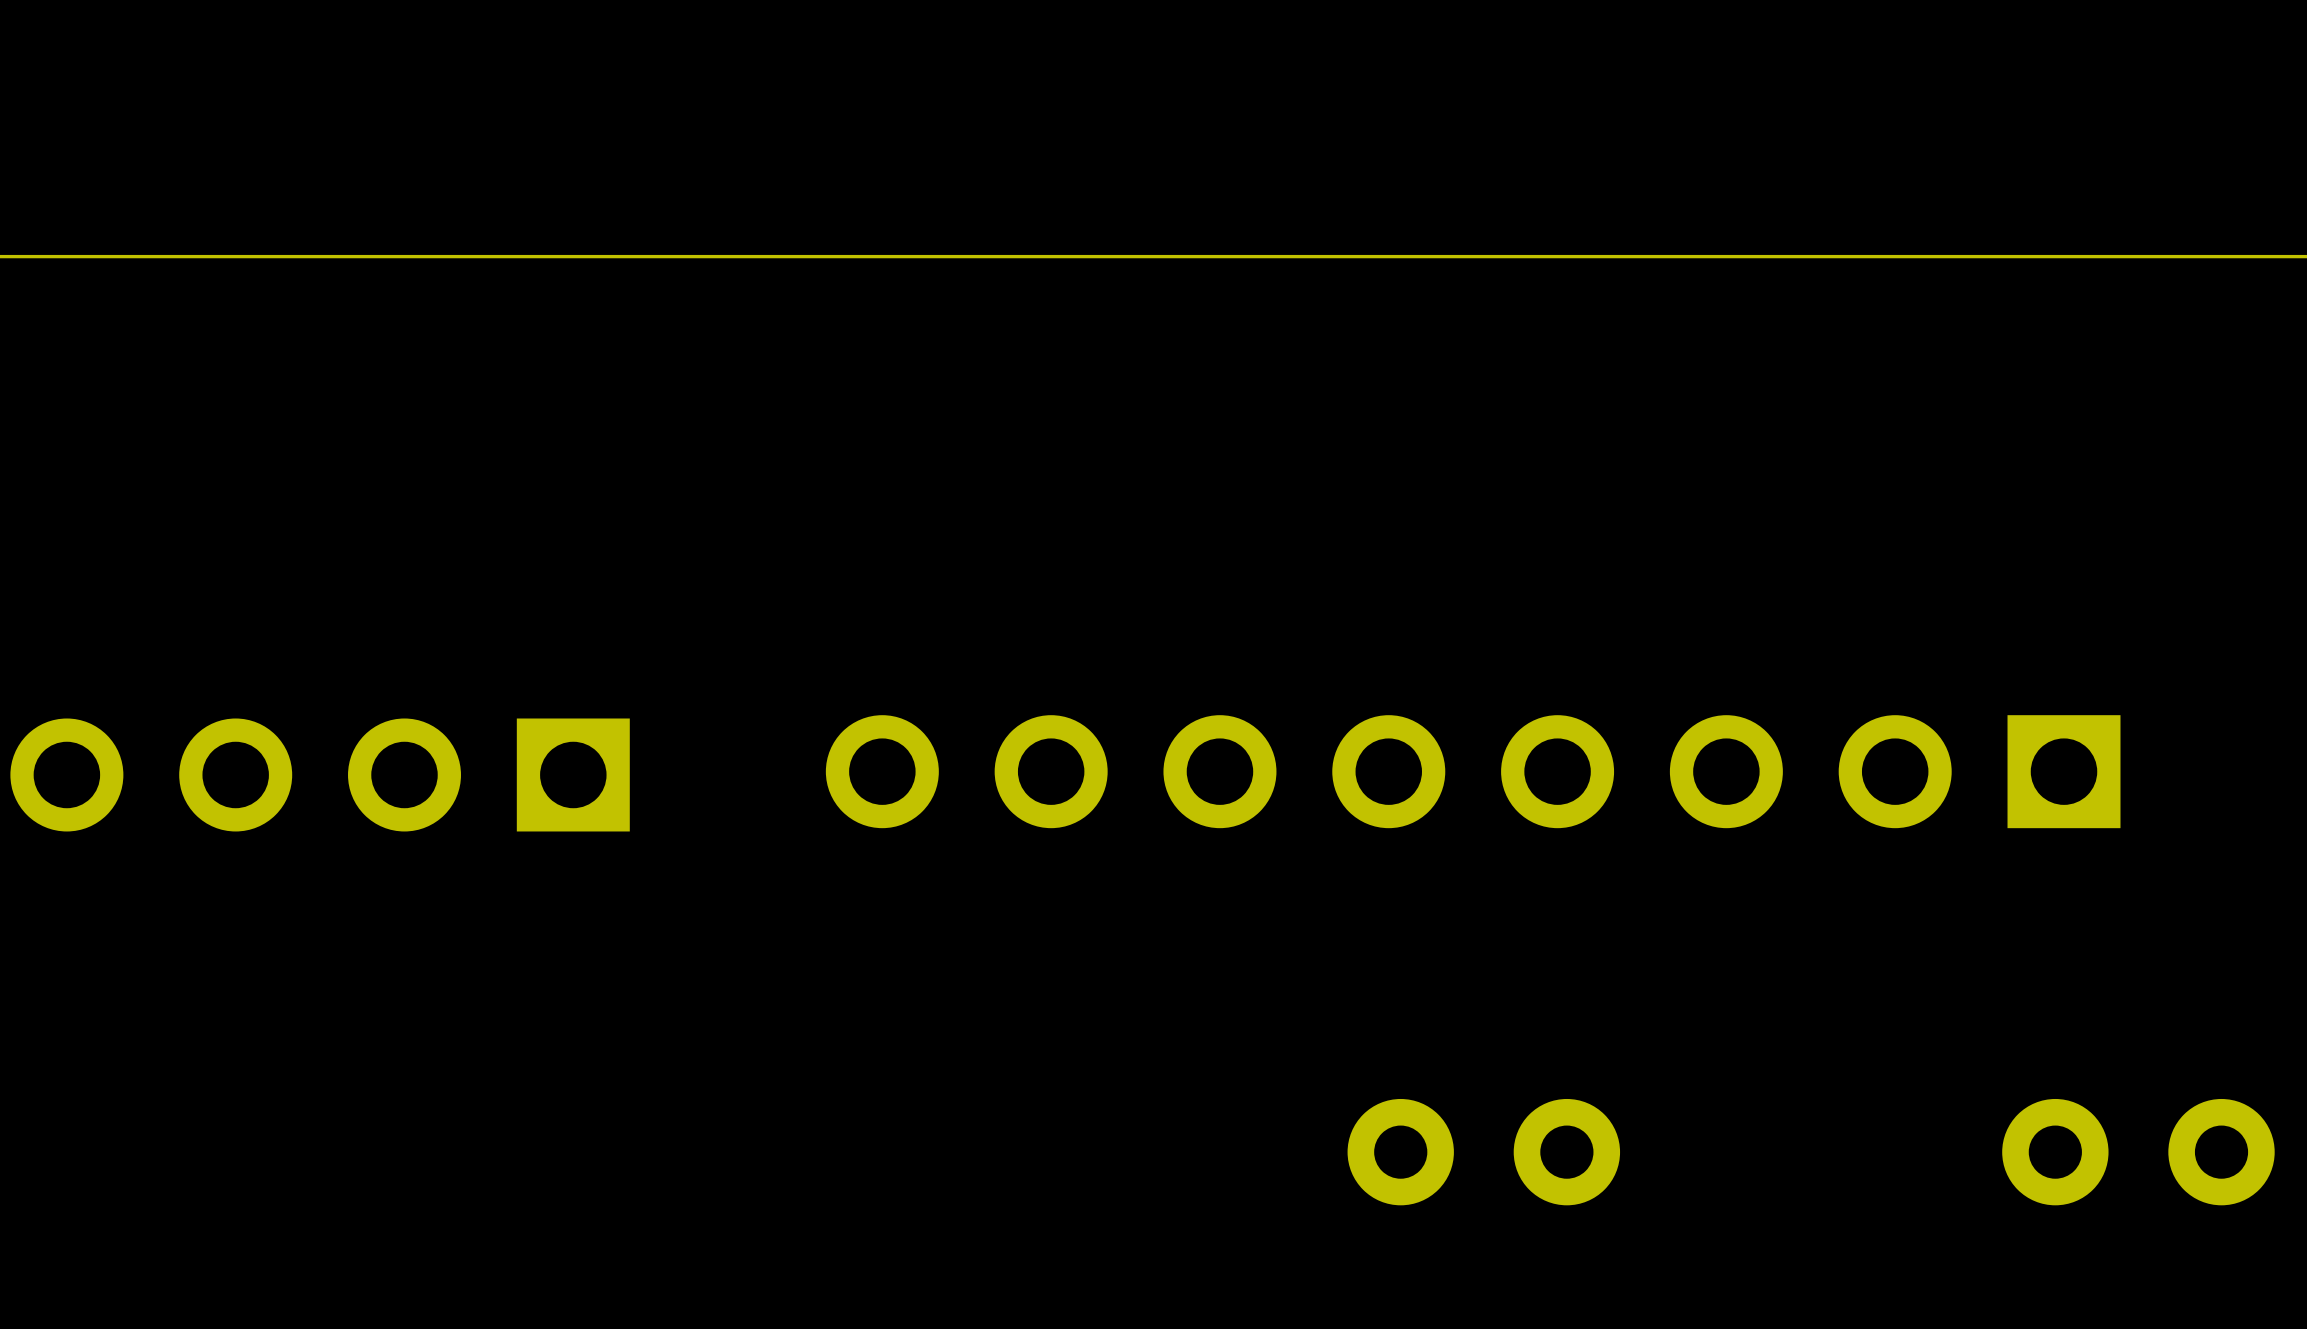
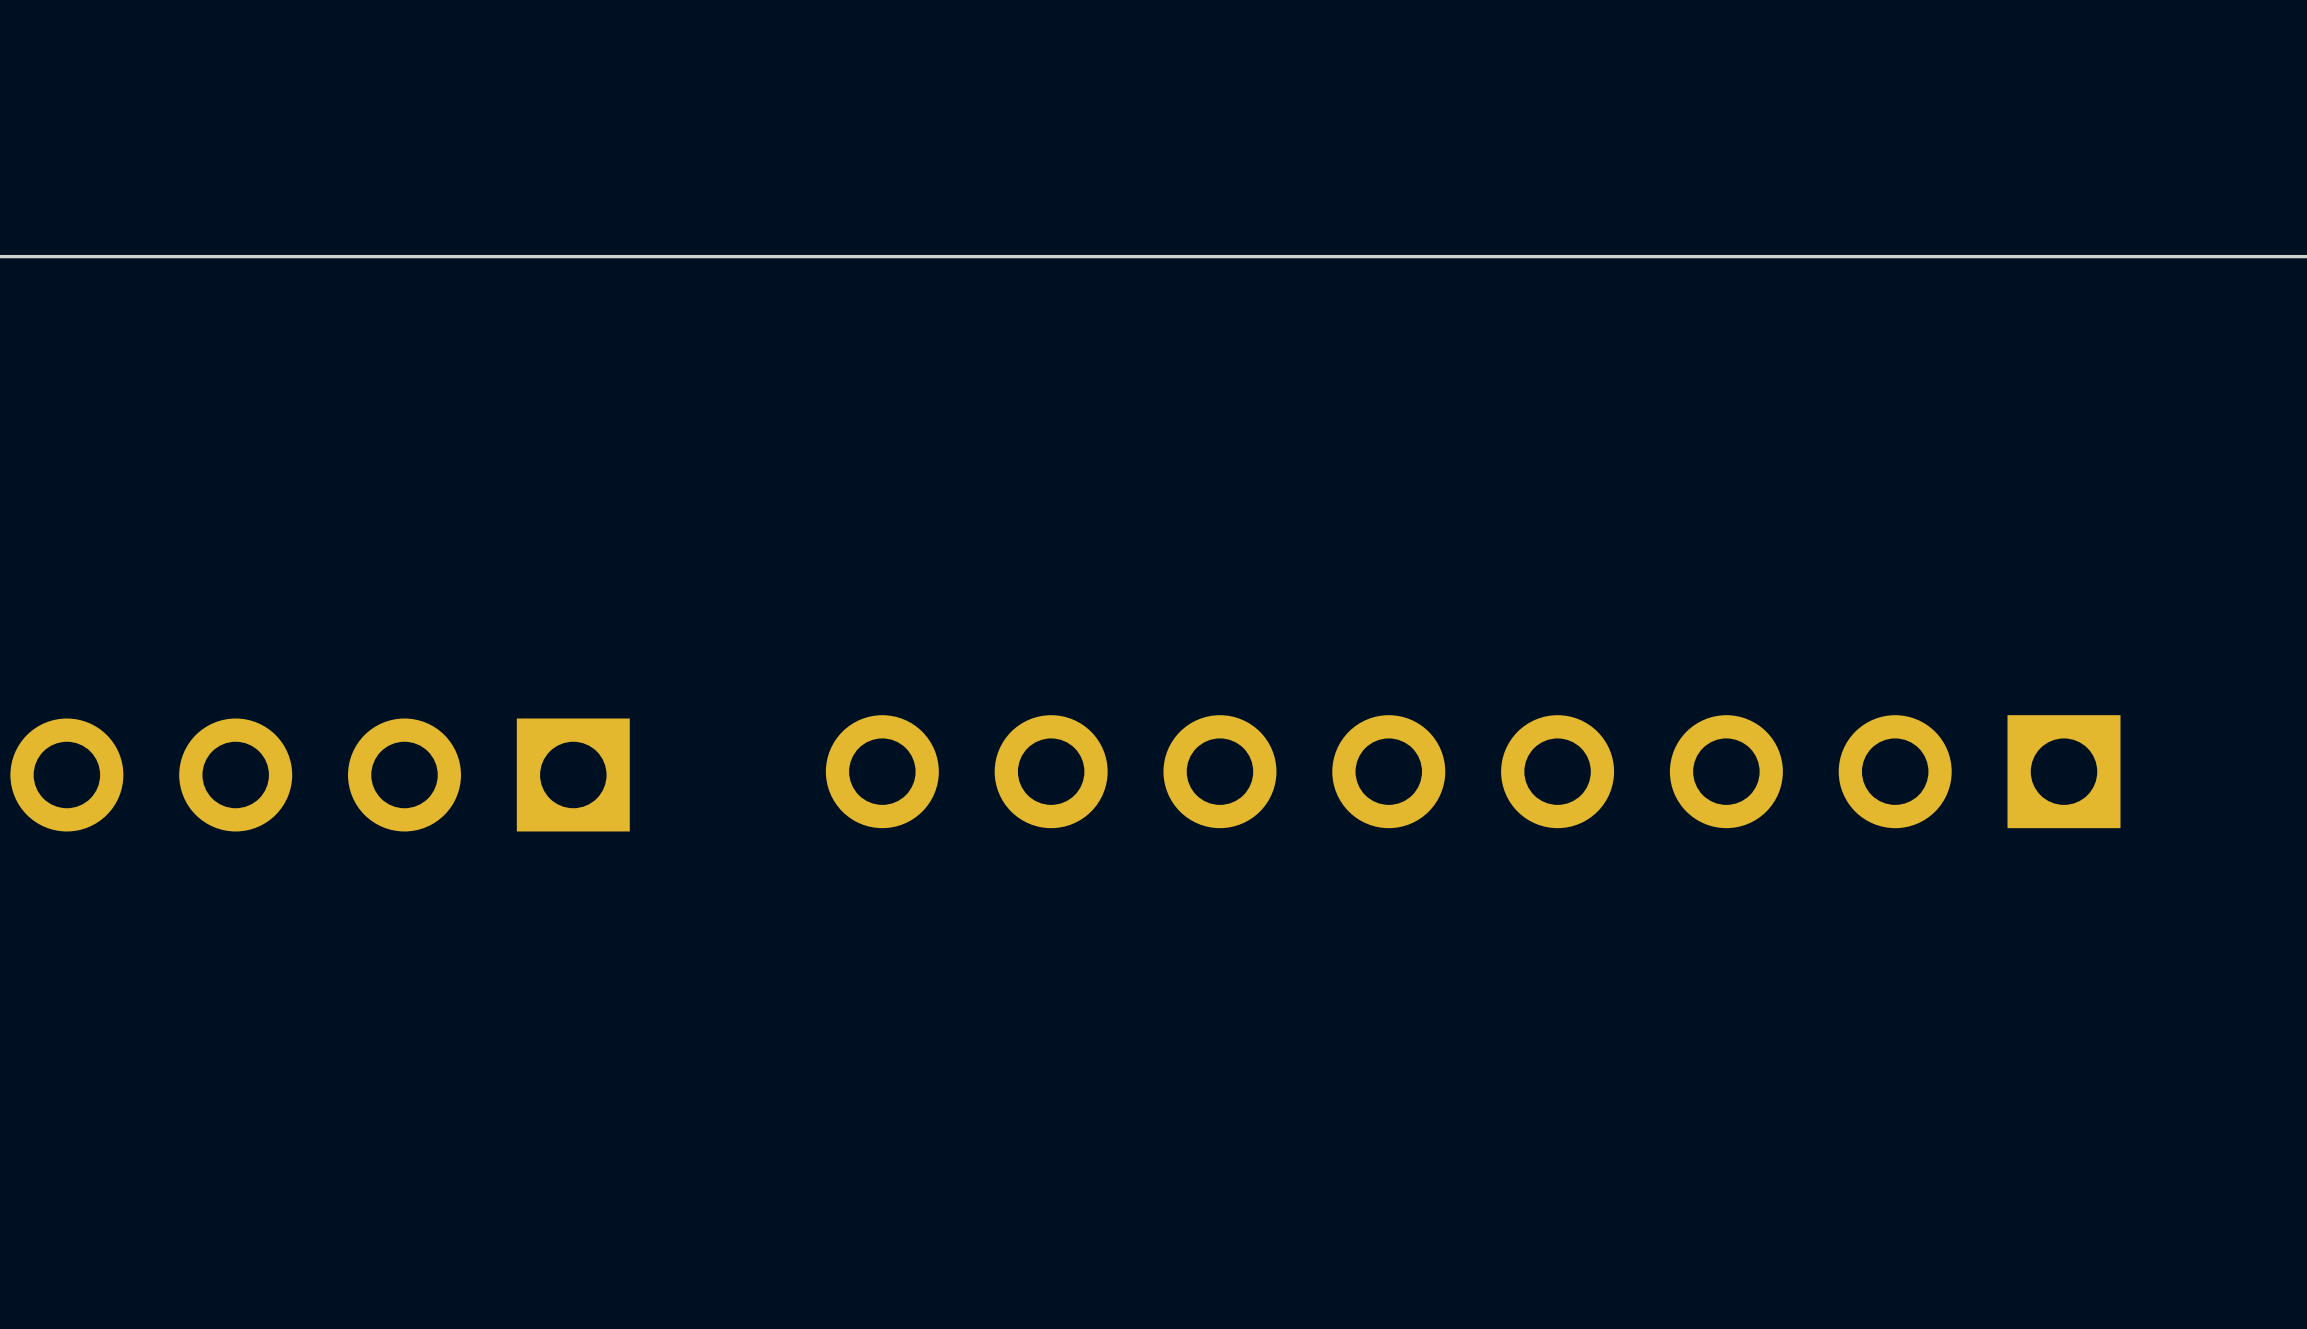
part: (1483, 1152) -> none
part: (2138, 1152) -> none

